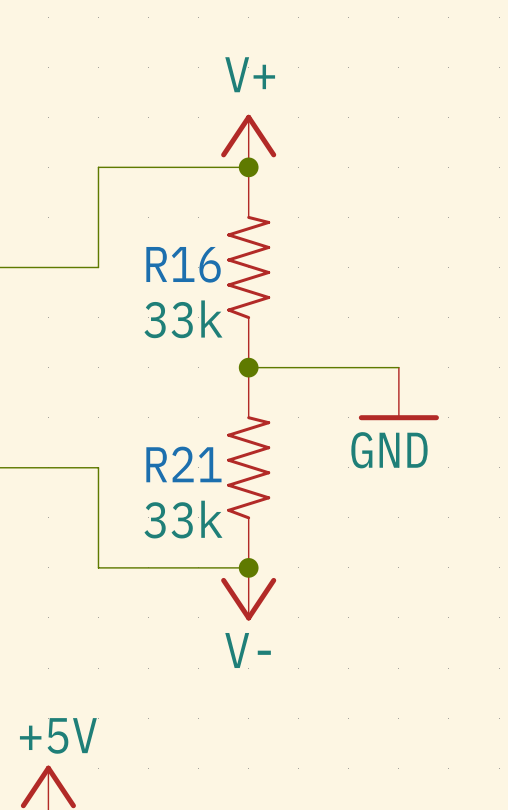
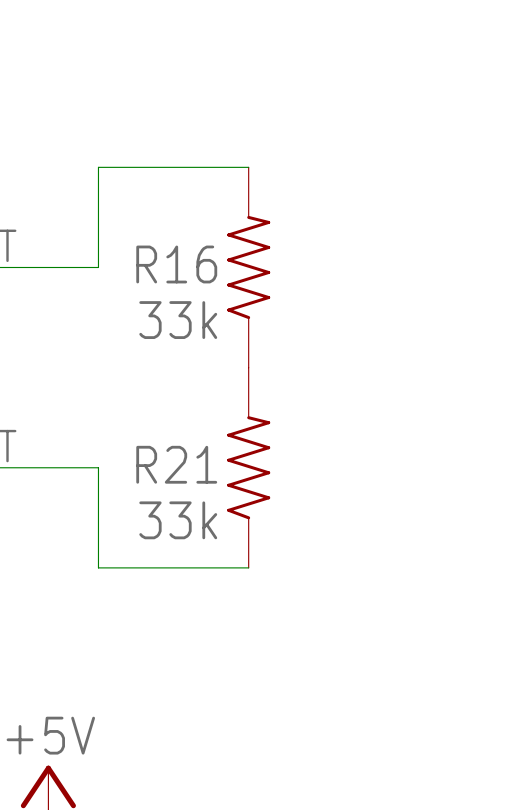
power symbol: V+ (248, 141) -> none
junction: (248, 167) -> none
wire: (248, 367) (398, 367) -> none
junction: (248, 367) -> none
power symbol: GND (398, 393) -> none
junction: (248, 567) -> none
power symbol: V- (248, 594) -> none

